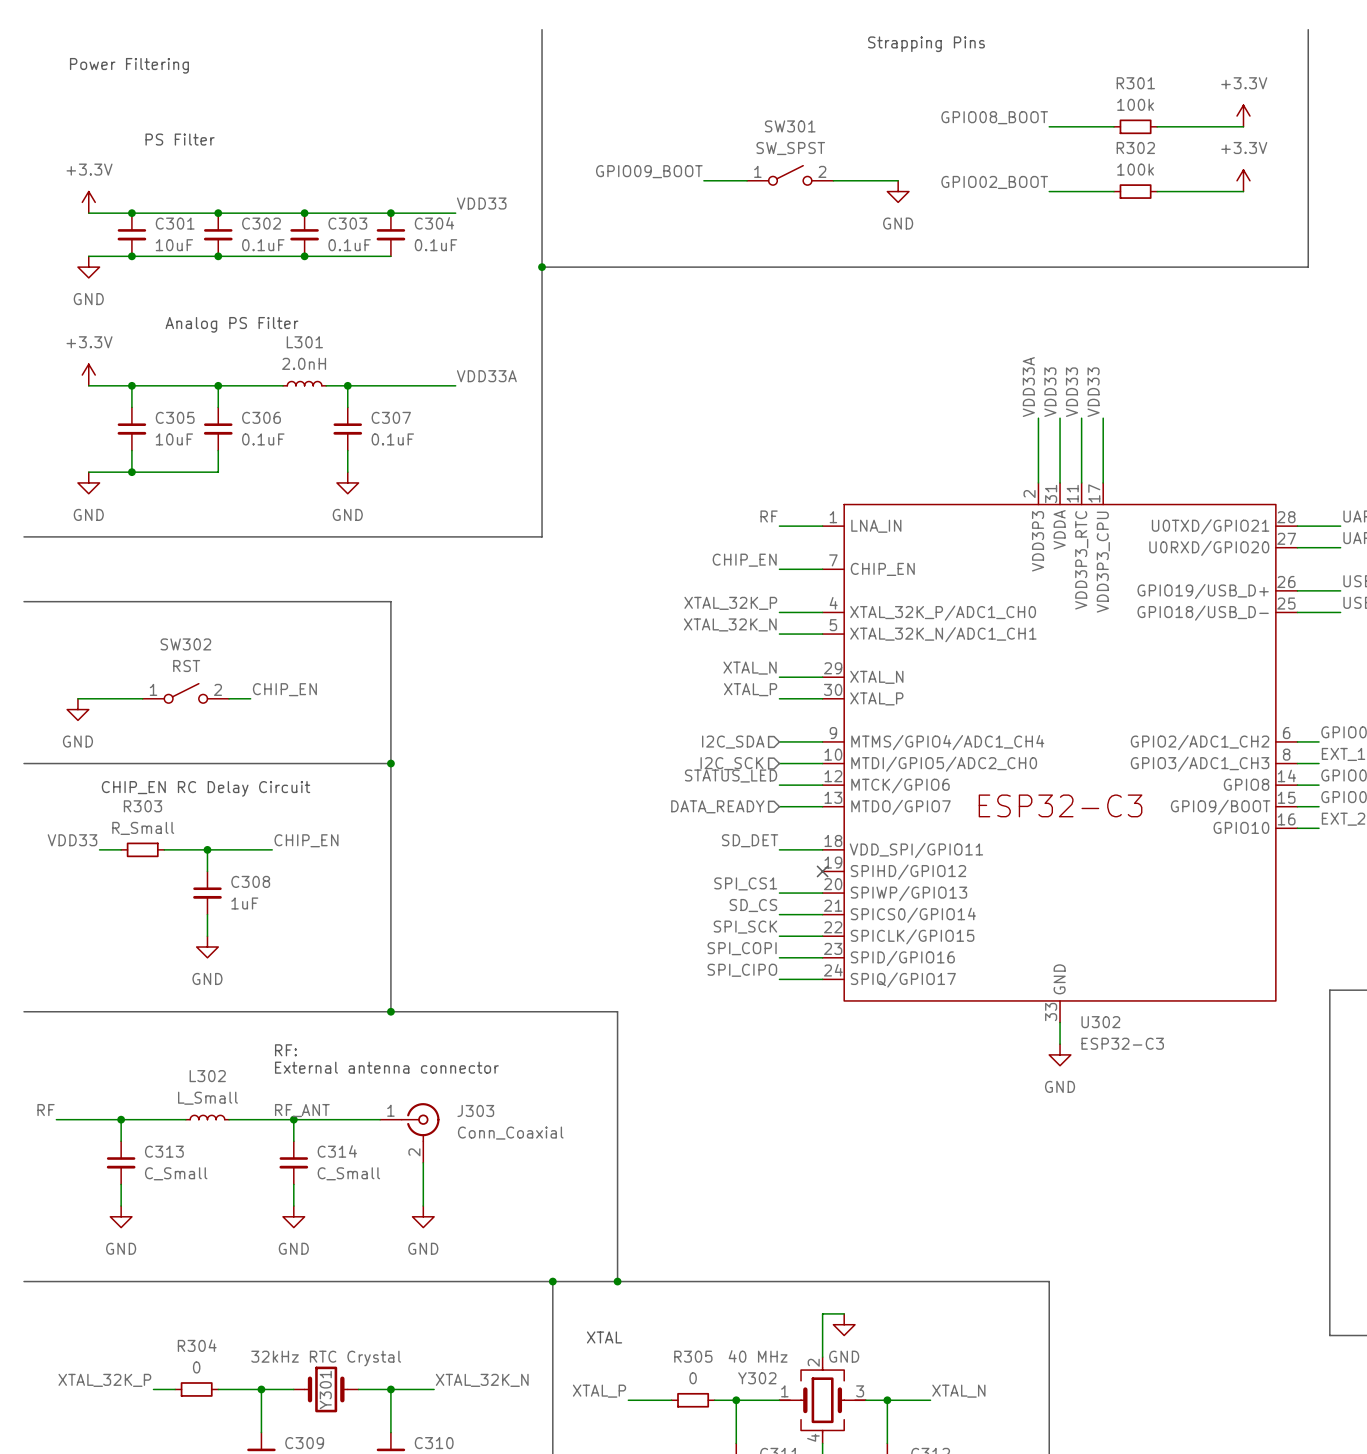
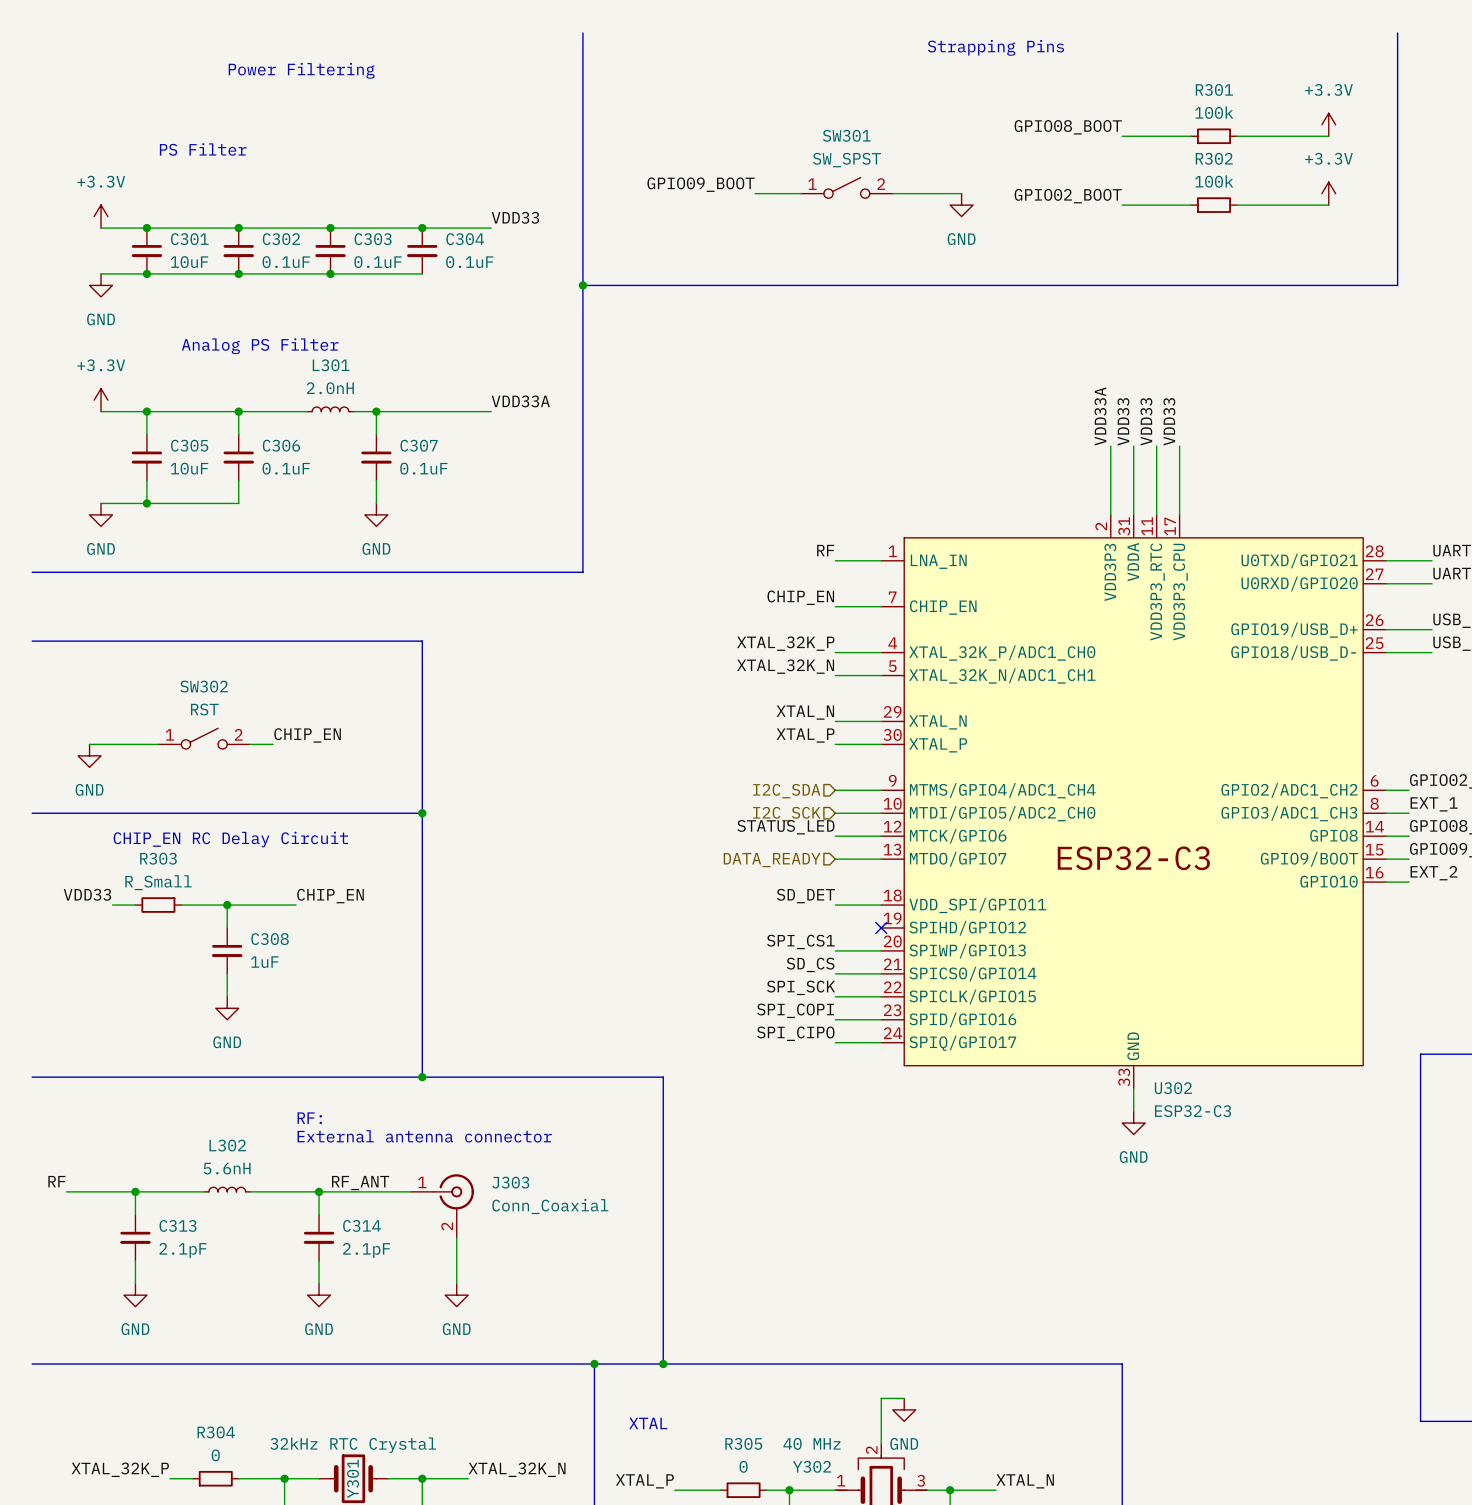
text position: Power Filtering (129, 65) -> Power Filtering (301, 70)
L302 value: L_Small (207, 1098) -> 5.6nH (227, 1168)
label position: RF_ANT (302, 1110) -> RF_ANT (360, 1183)
C313 value: C_Small (176, 1173) -> 2.1pF (183, 1250)
C314 value: C_Small (348, 1173) -> 2.1pF (366, 1250)

